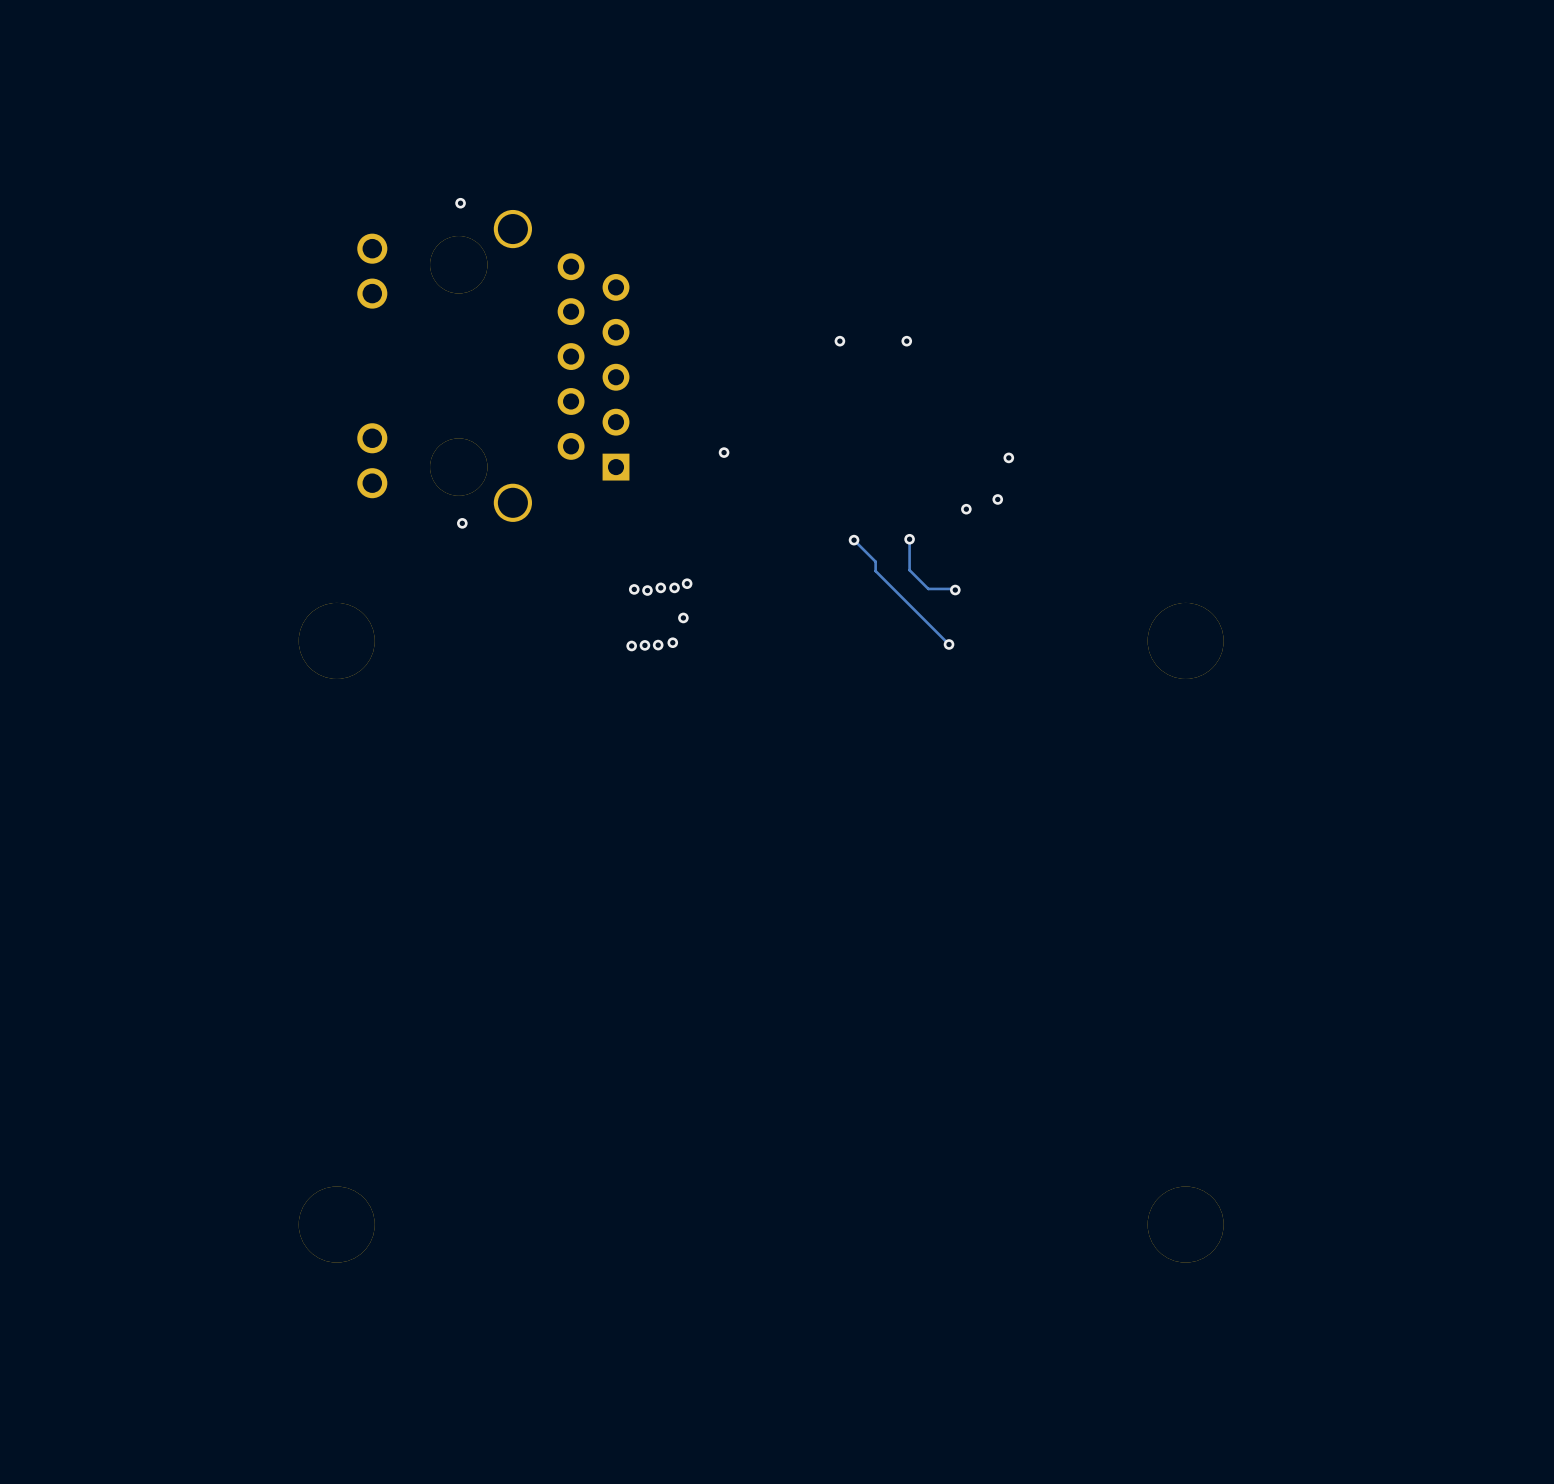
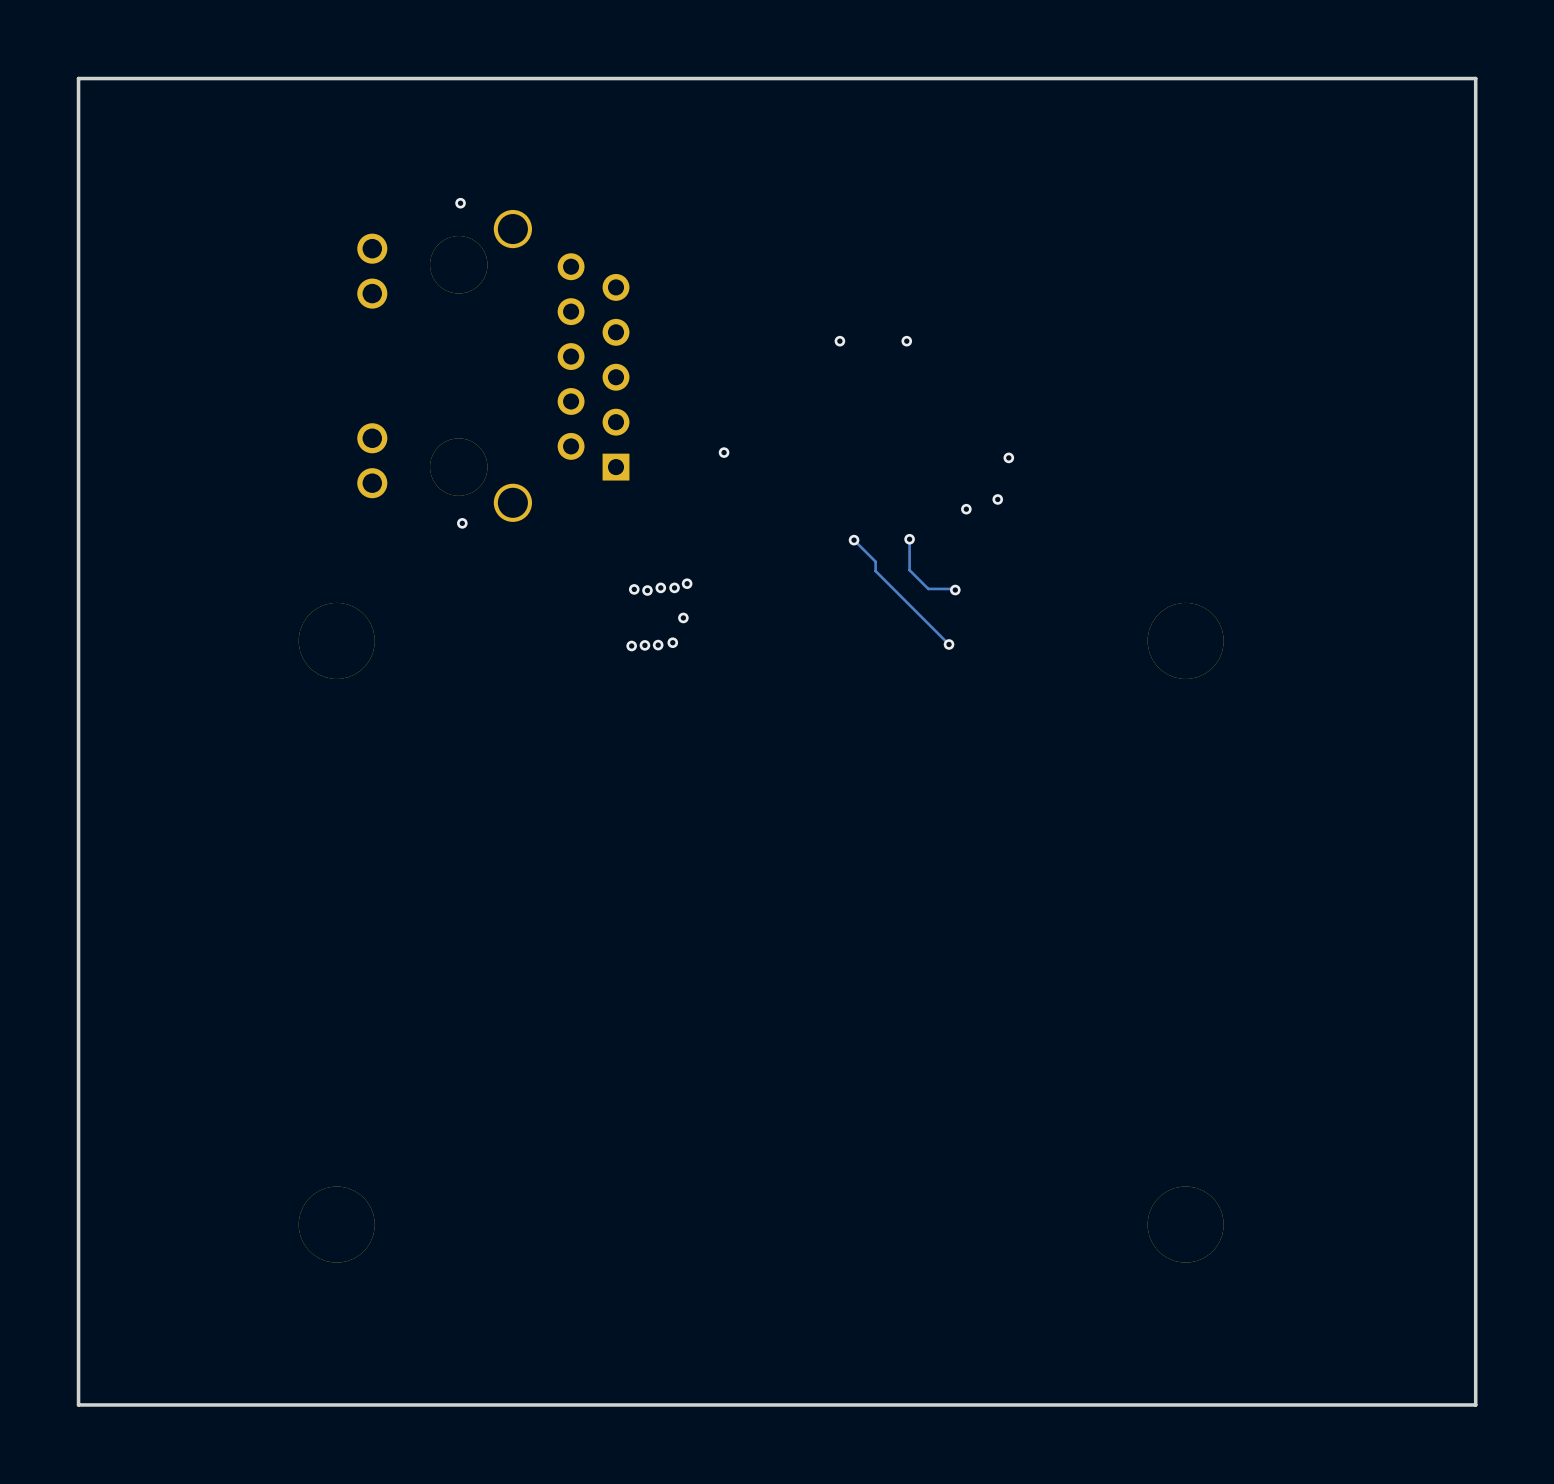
board edge: none -> (1475, 78) (78, 78) (78, 1404) (1475, 1404) (1475, 78)

